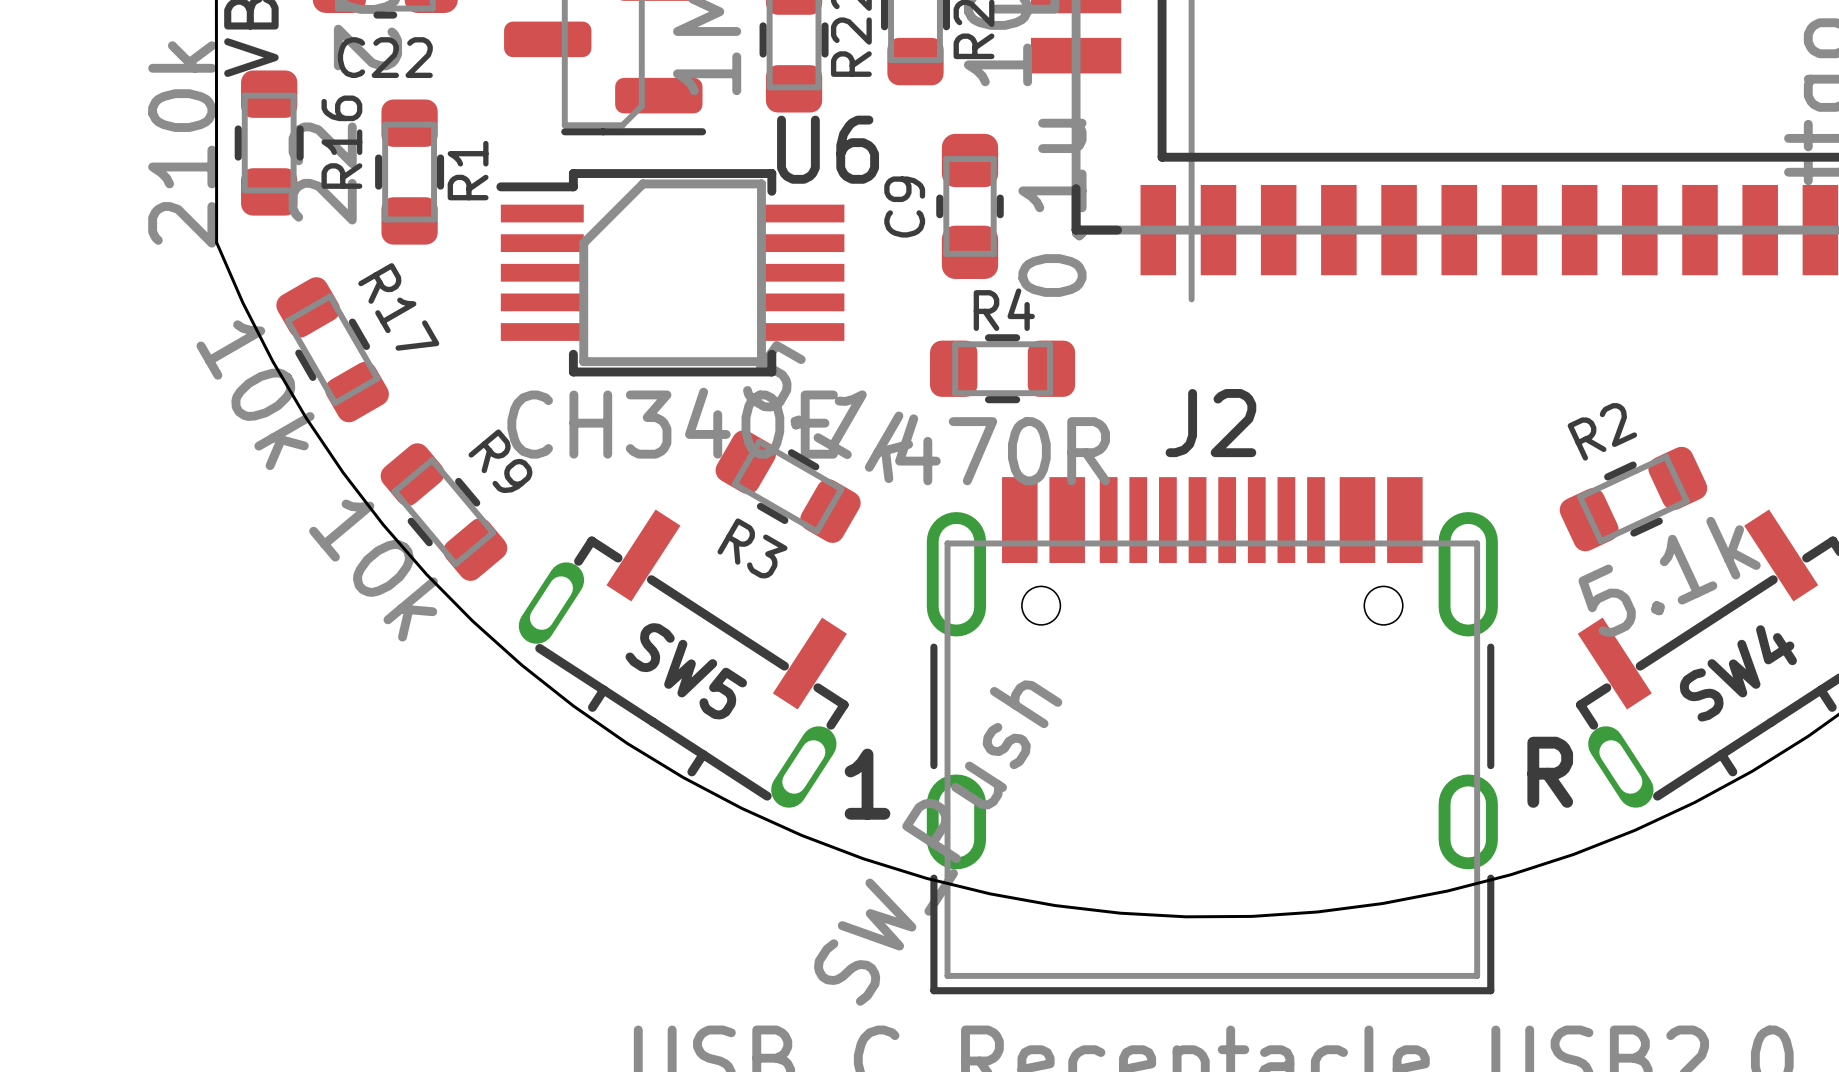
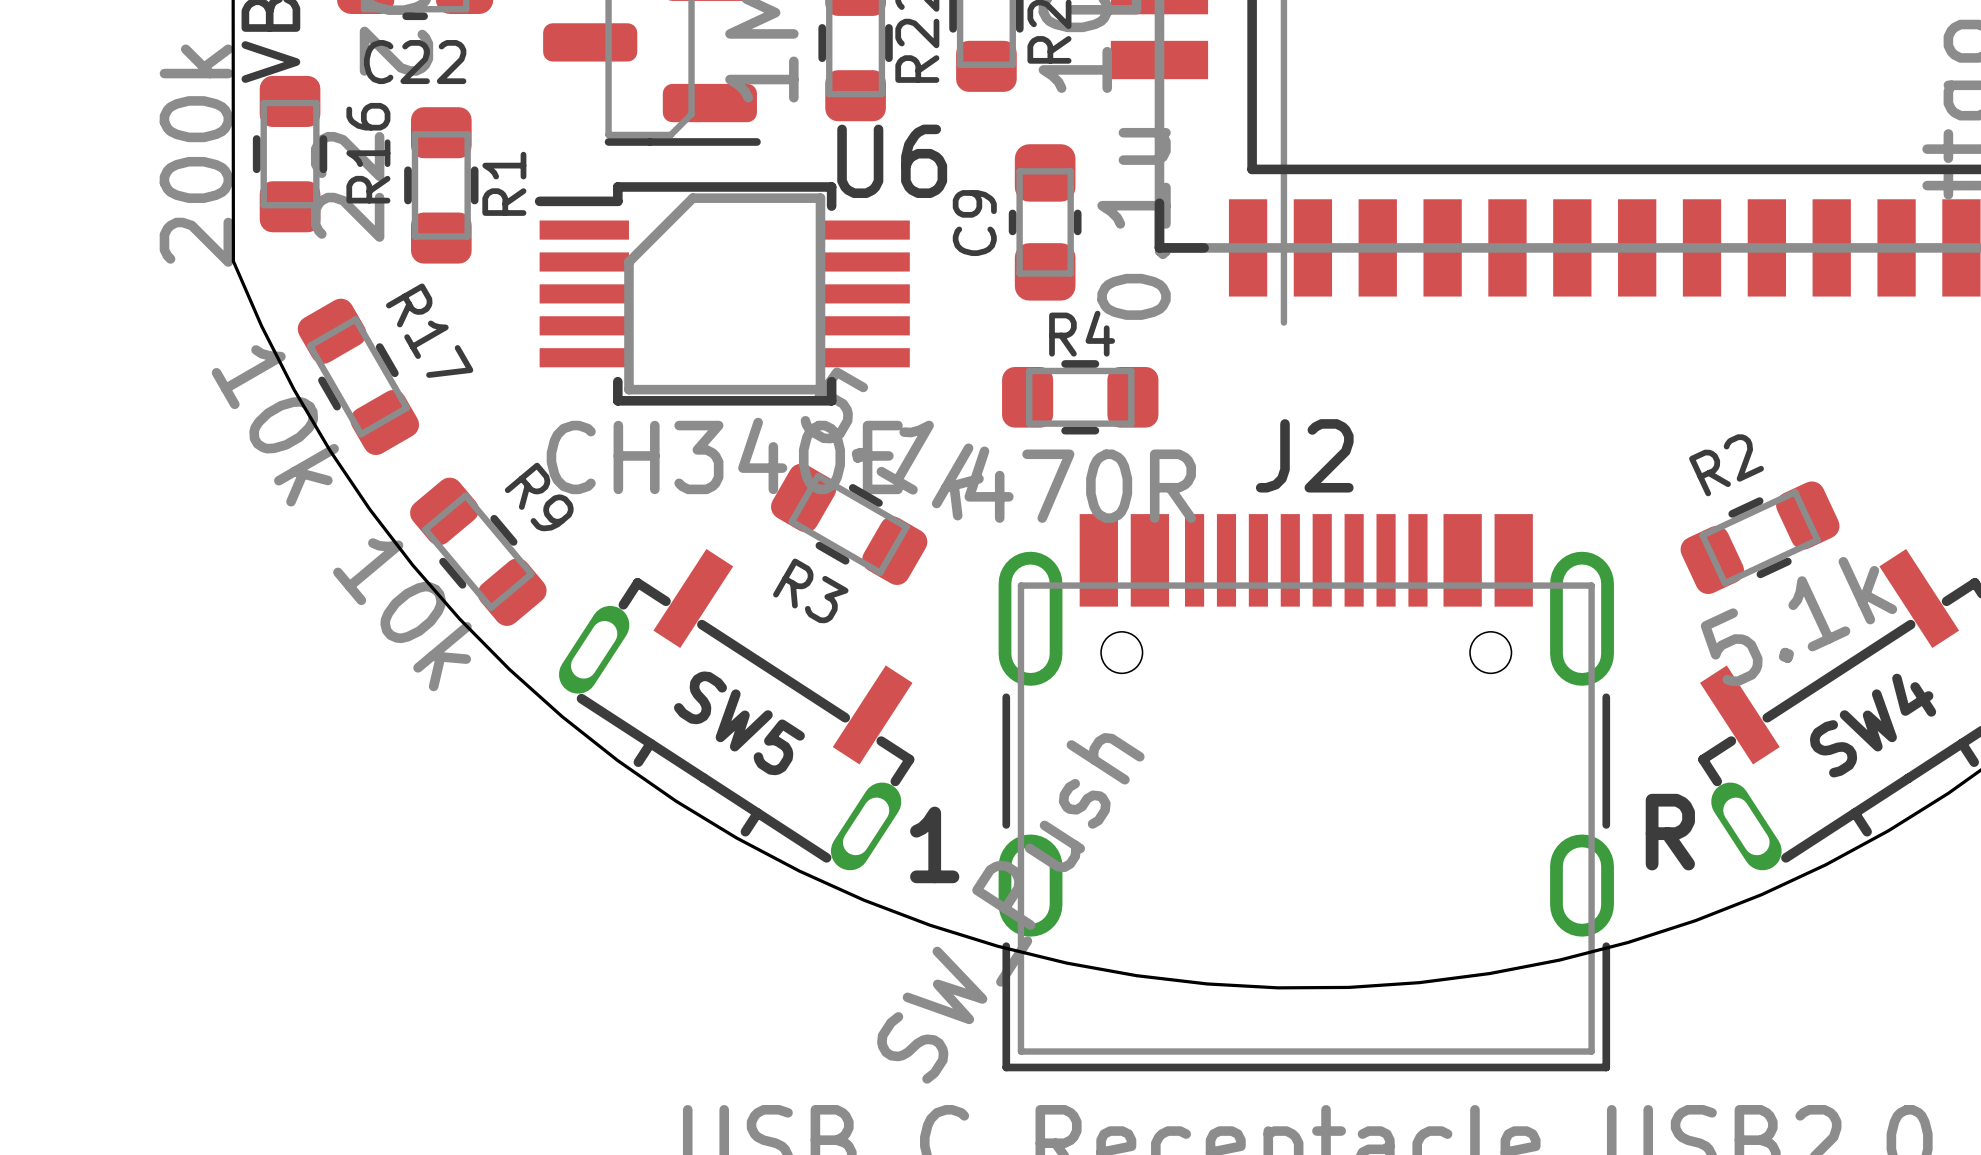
R16 value: 210k (182, 144) -> 200k (196, 155)

